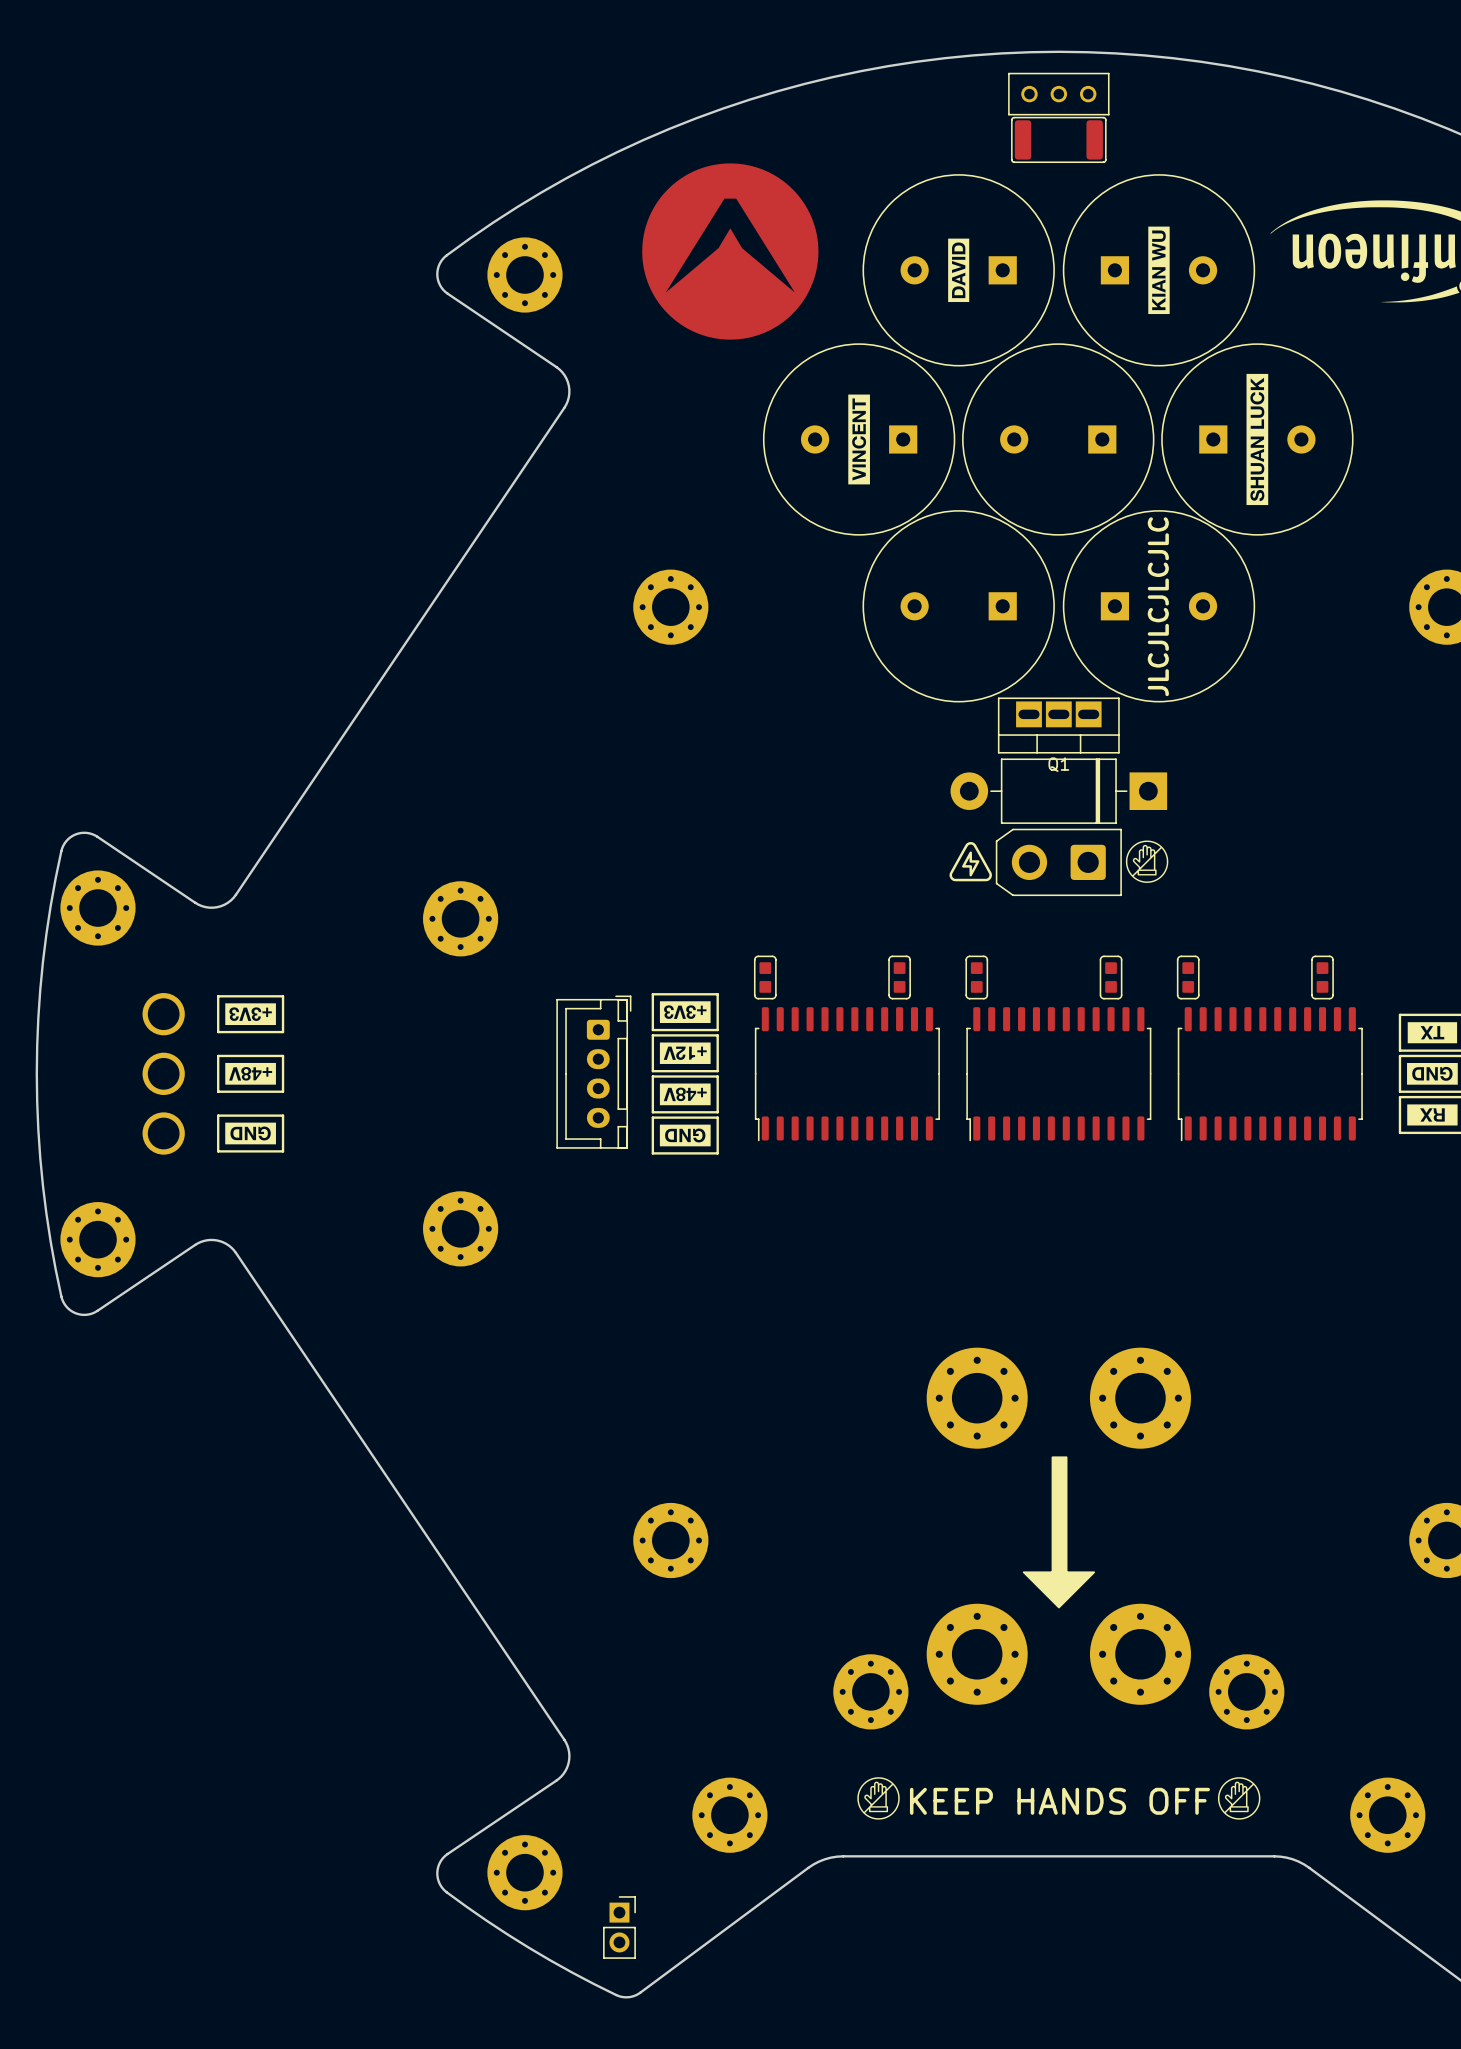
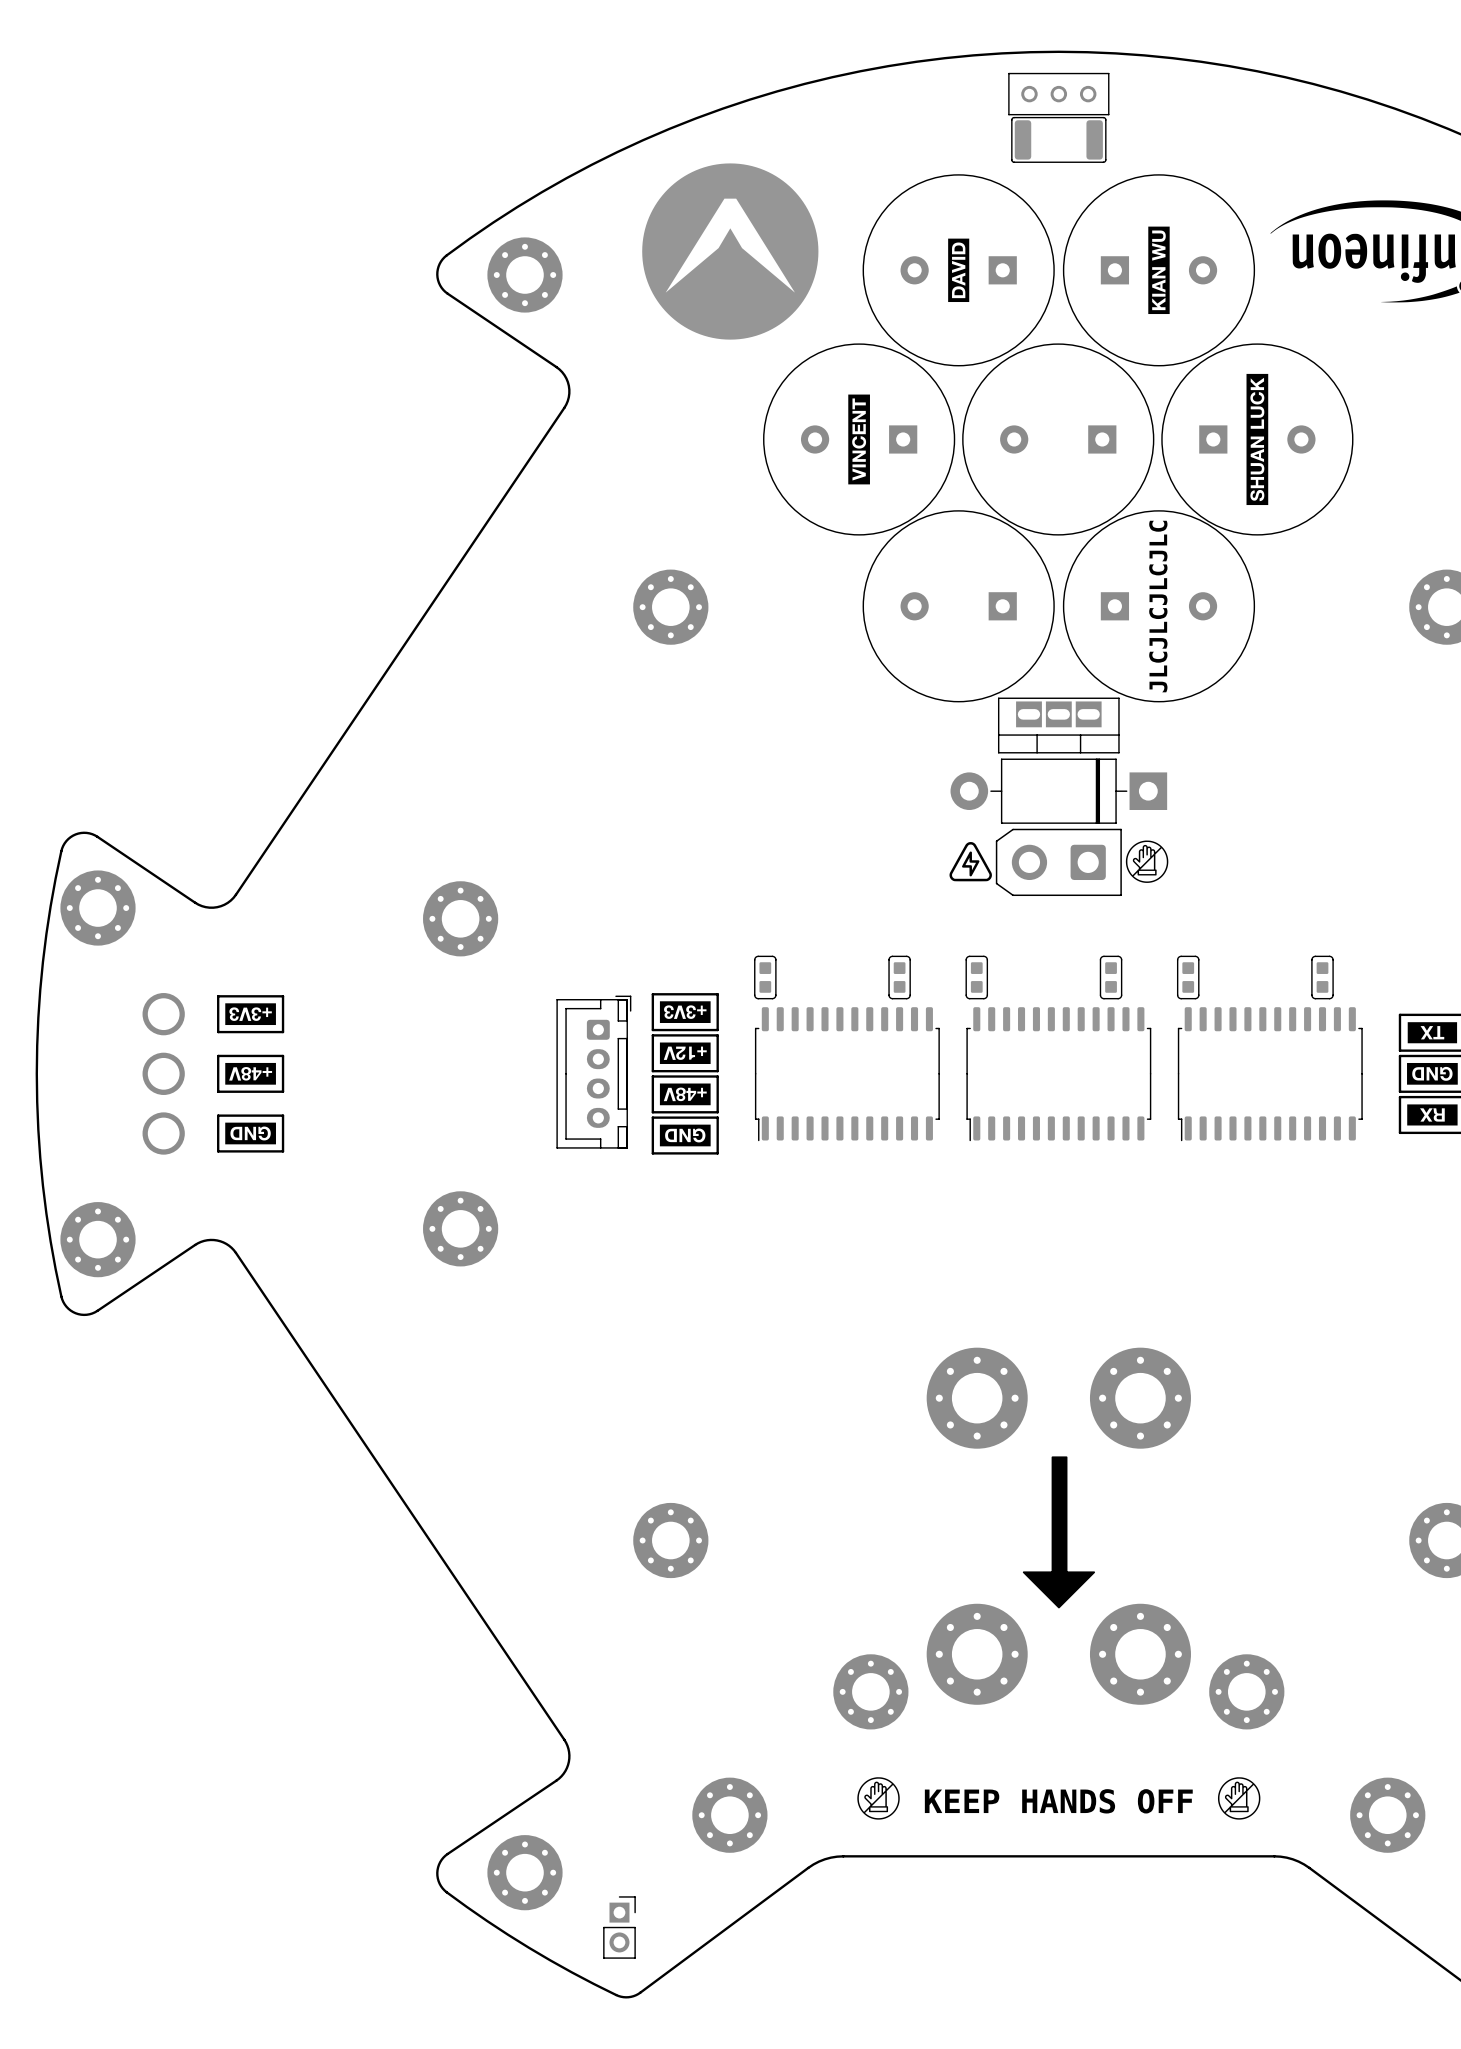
Q1: (1058, 725) -> none
part: none -> (1058, 725)

